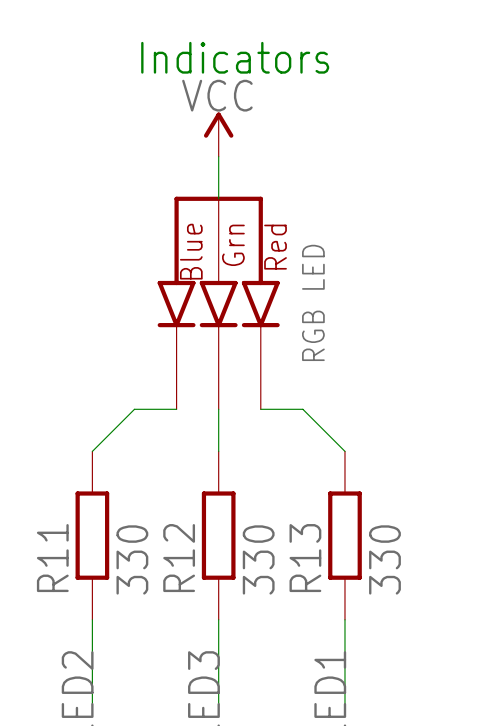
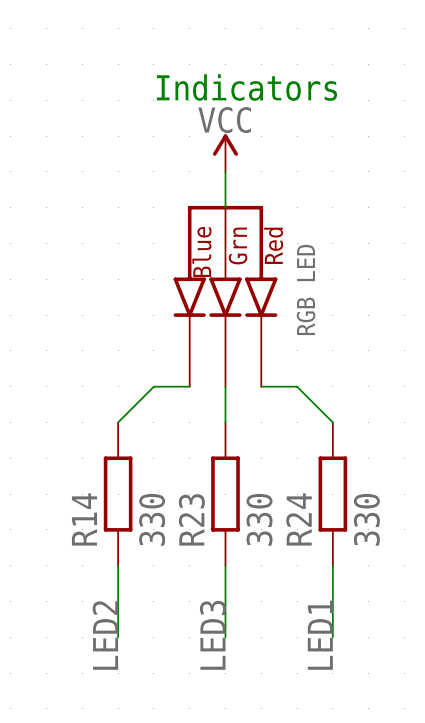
R11 name: R11 (52, 558) -> R14 (84, 519)
R12 name: R12 (179, 558) -> R23 (191, 519)
R13 name: R13 (305, 558) -> R24 (298, 519)

